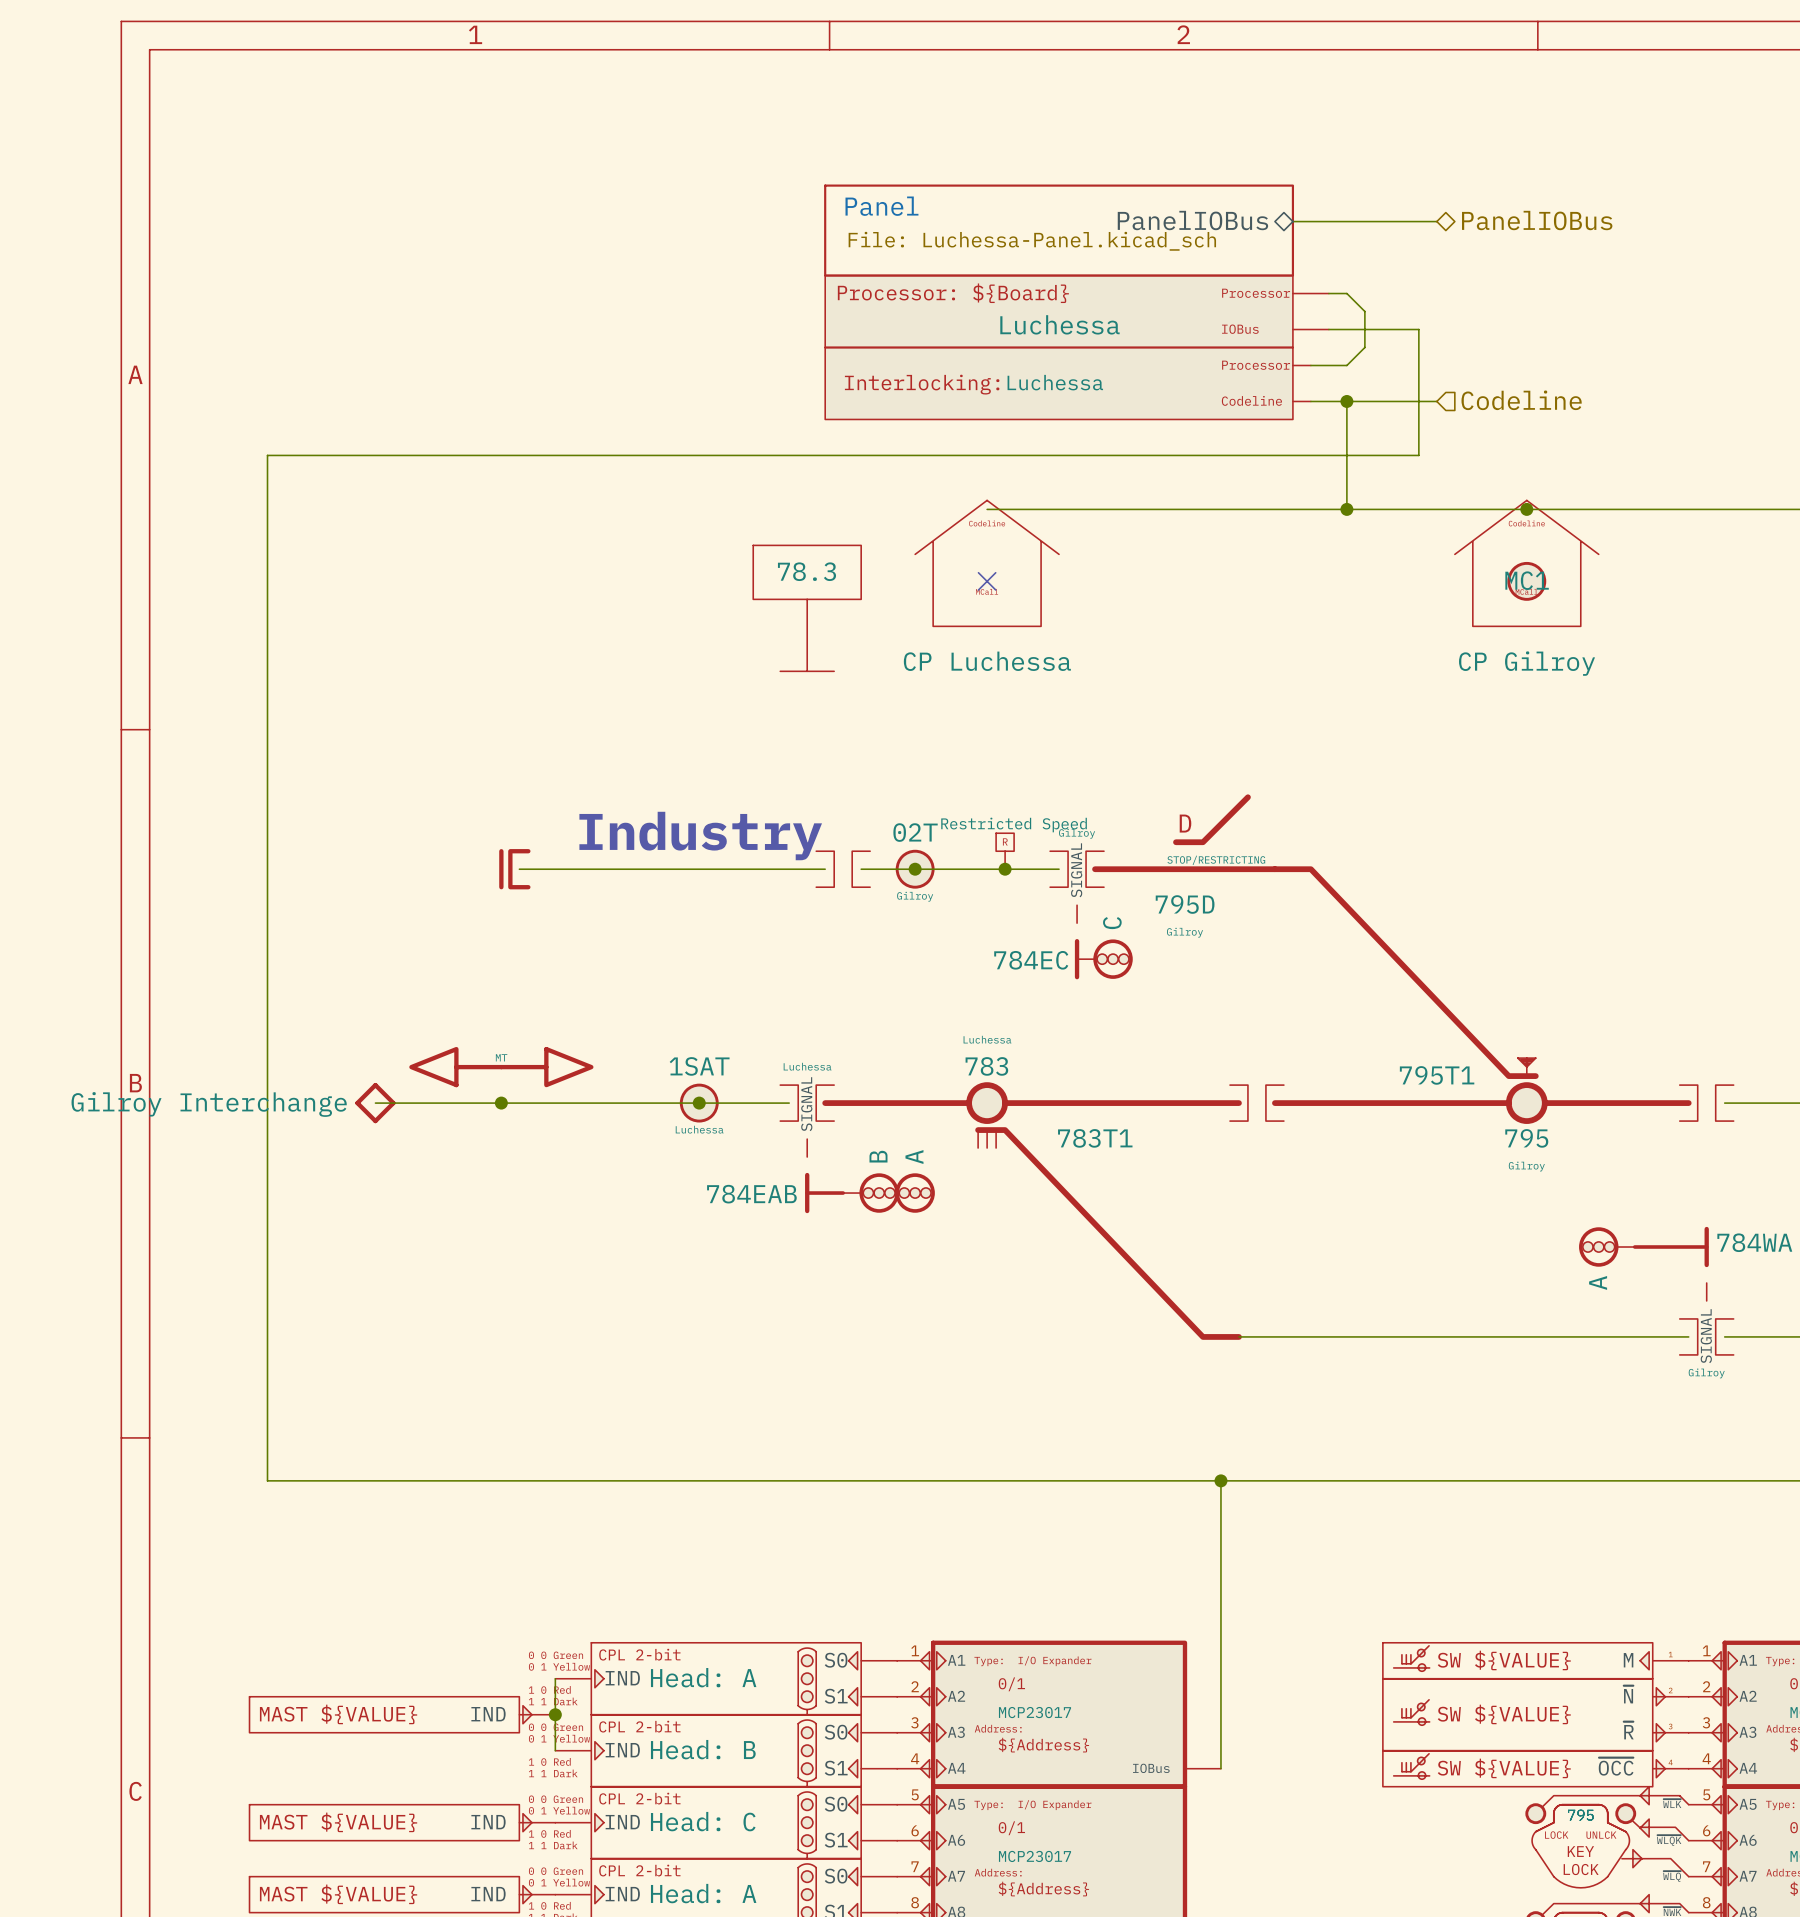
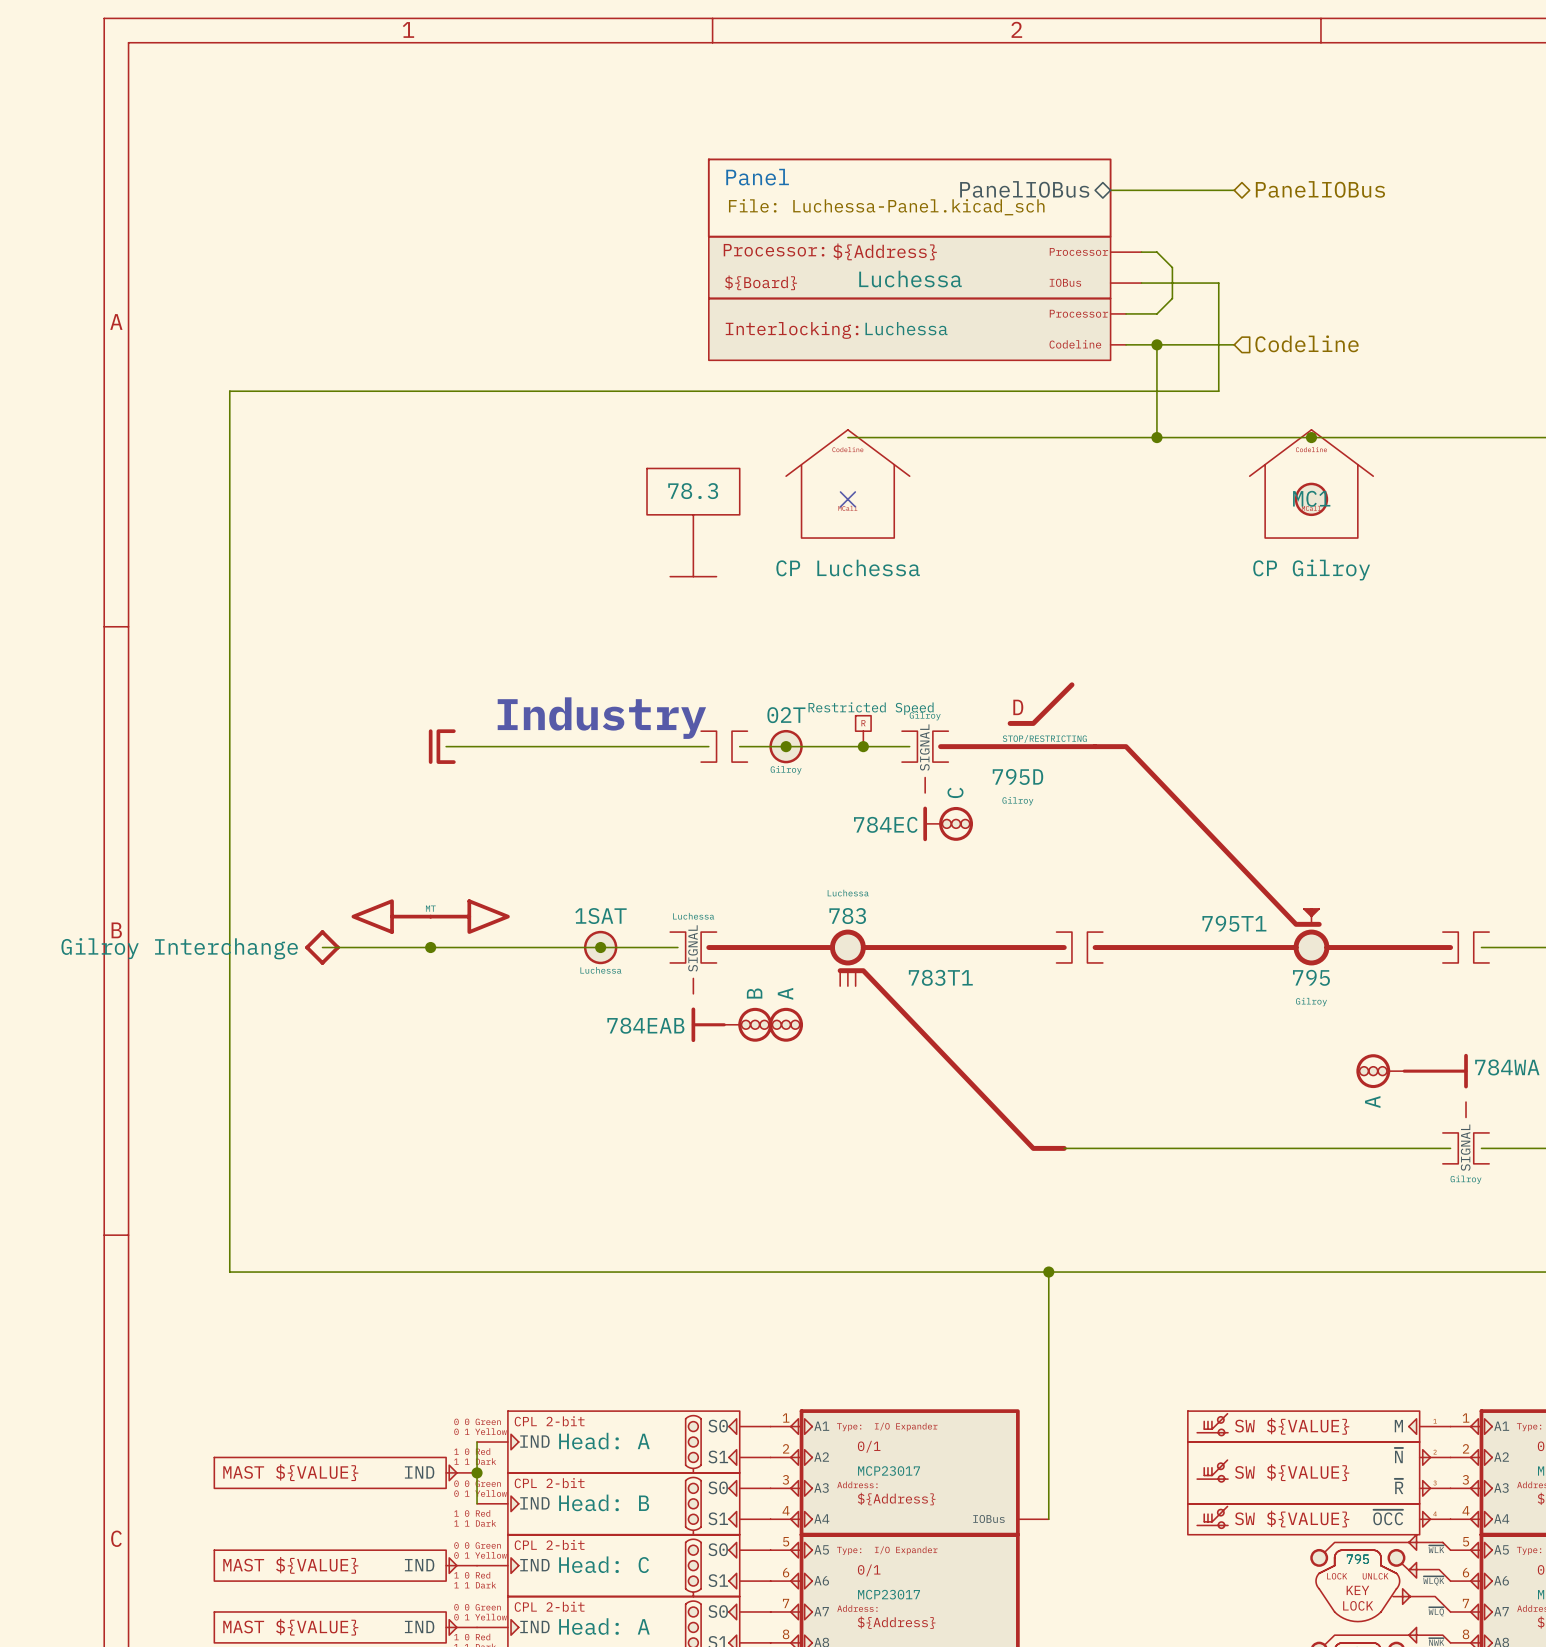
part text: none -> Processor: (774, 250)
part text: Processor: ${Board} (953, 293) -> none
part text: none -> ${Address} (885, 251)
part text: none -> ${Board} (761, 282)

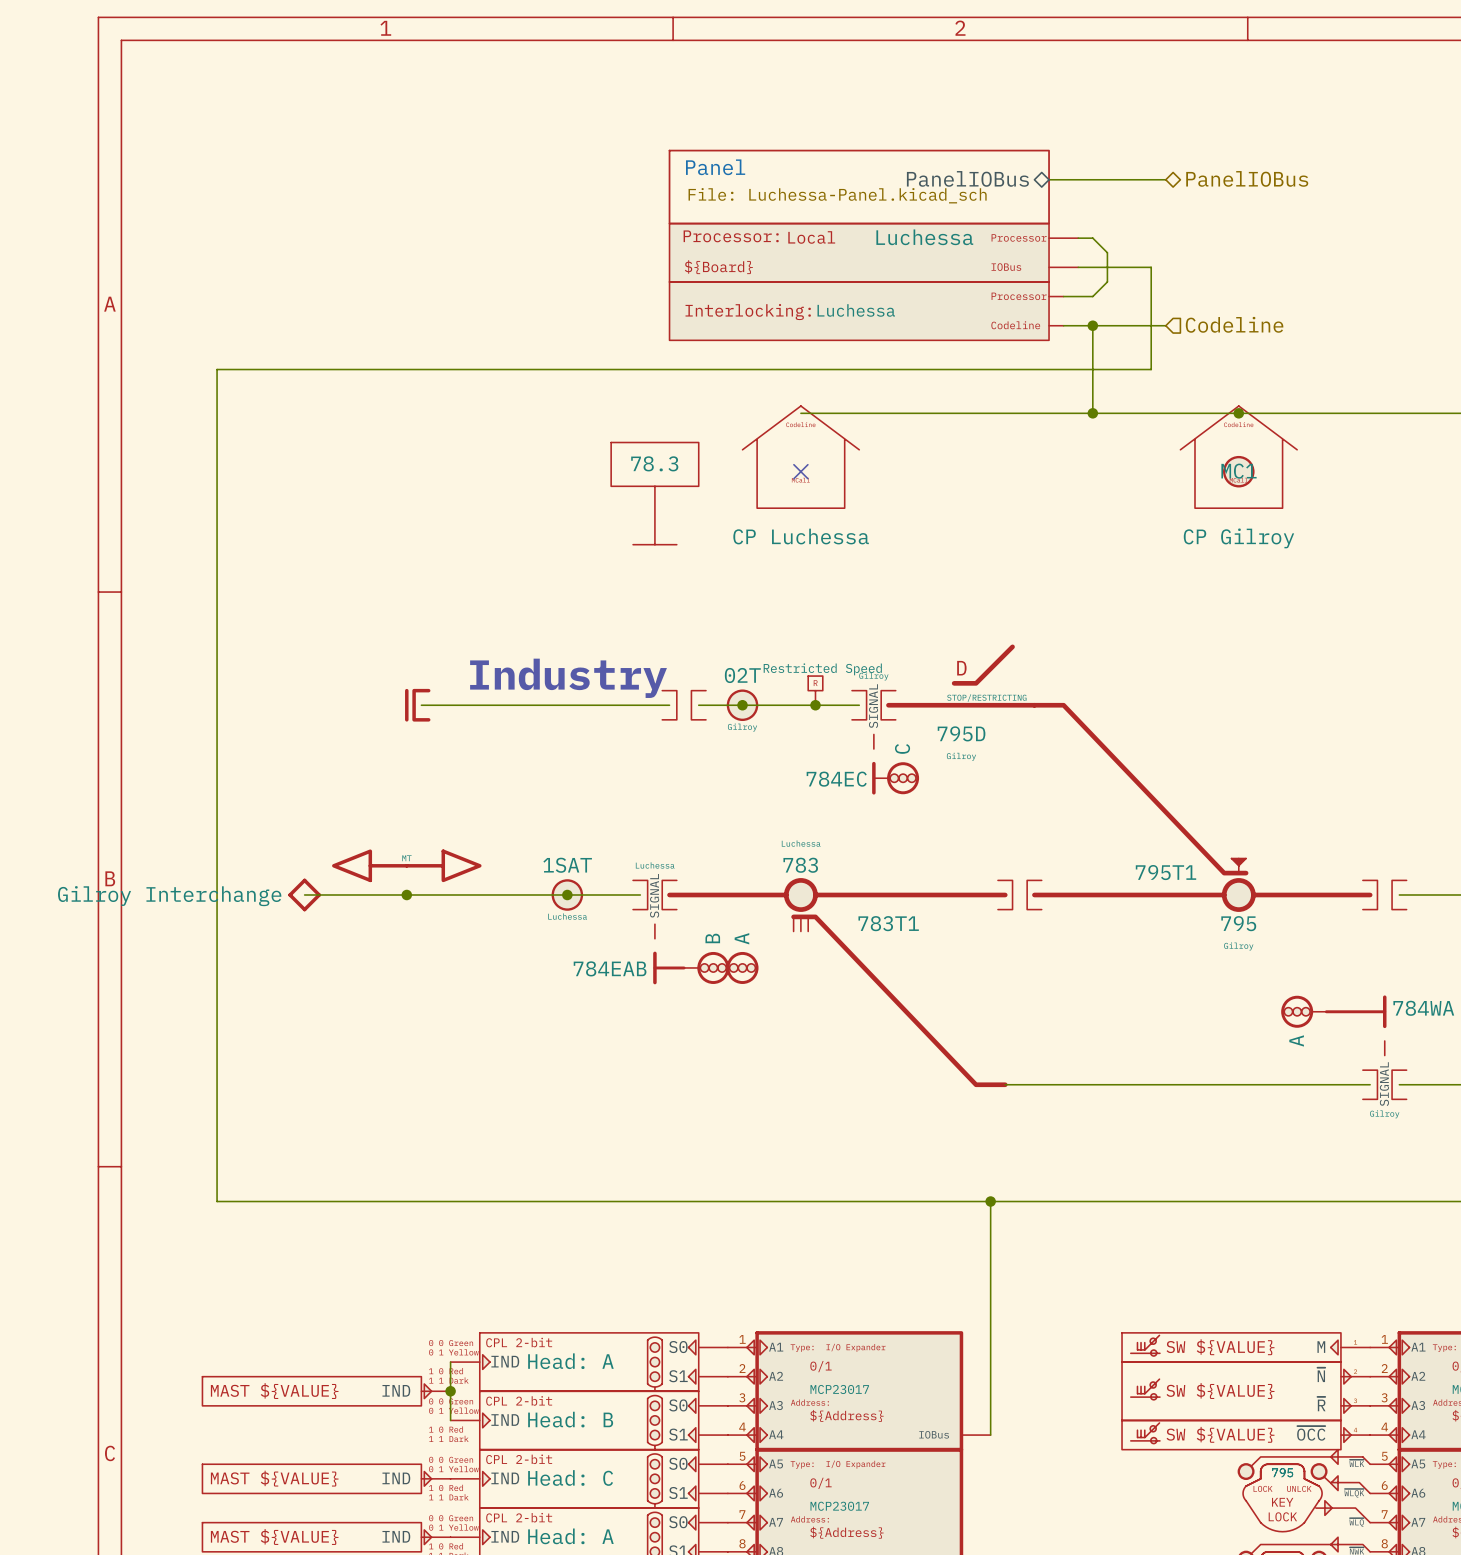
part text: ${Address} (885, 251) -> Local (811, 237)
part value position: Luchessa (910, 279) -> Luchessa (924, 237)

